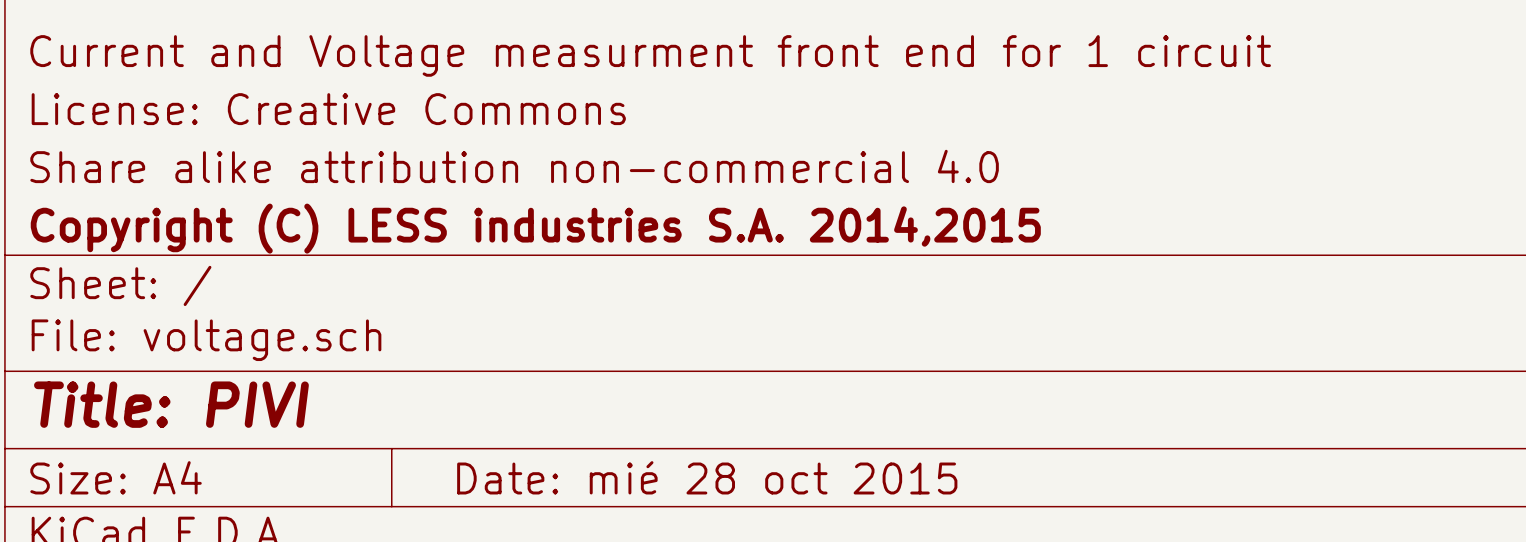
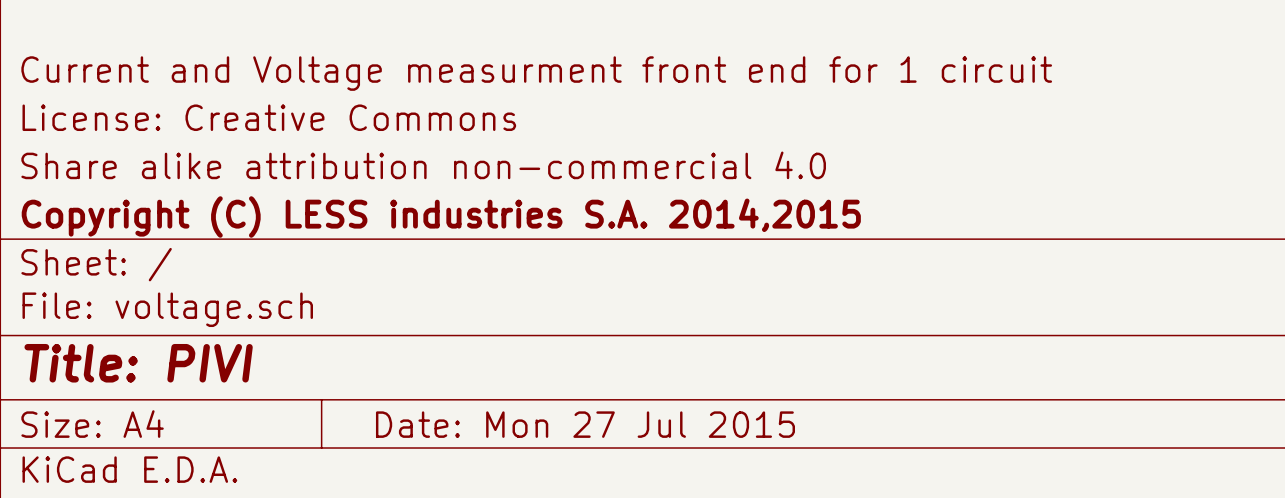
title block: Date: mié 28 oct 2015 (707, 477) -> Date: Mon 27 Jul 2015 (585, 424)

